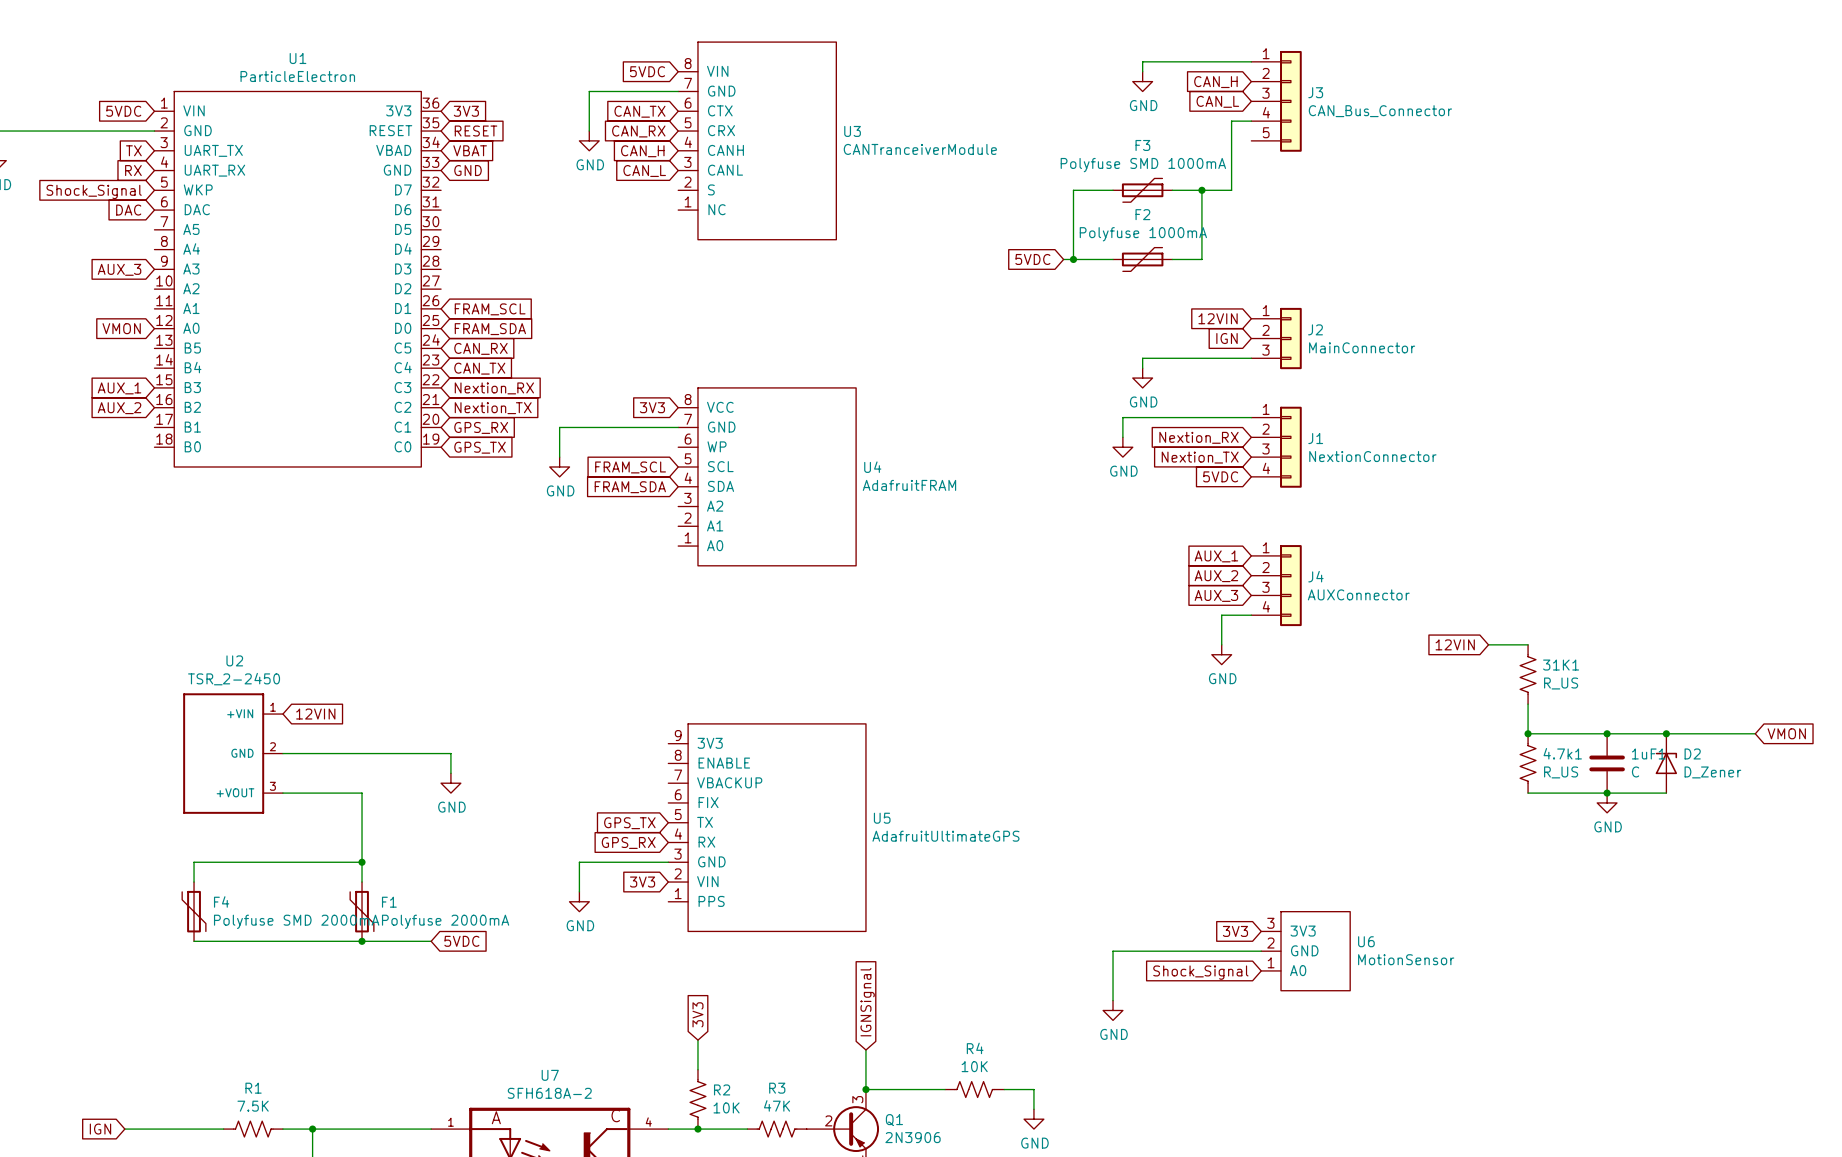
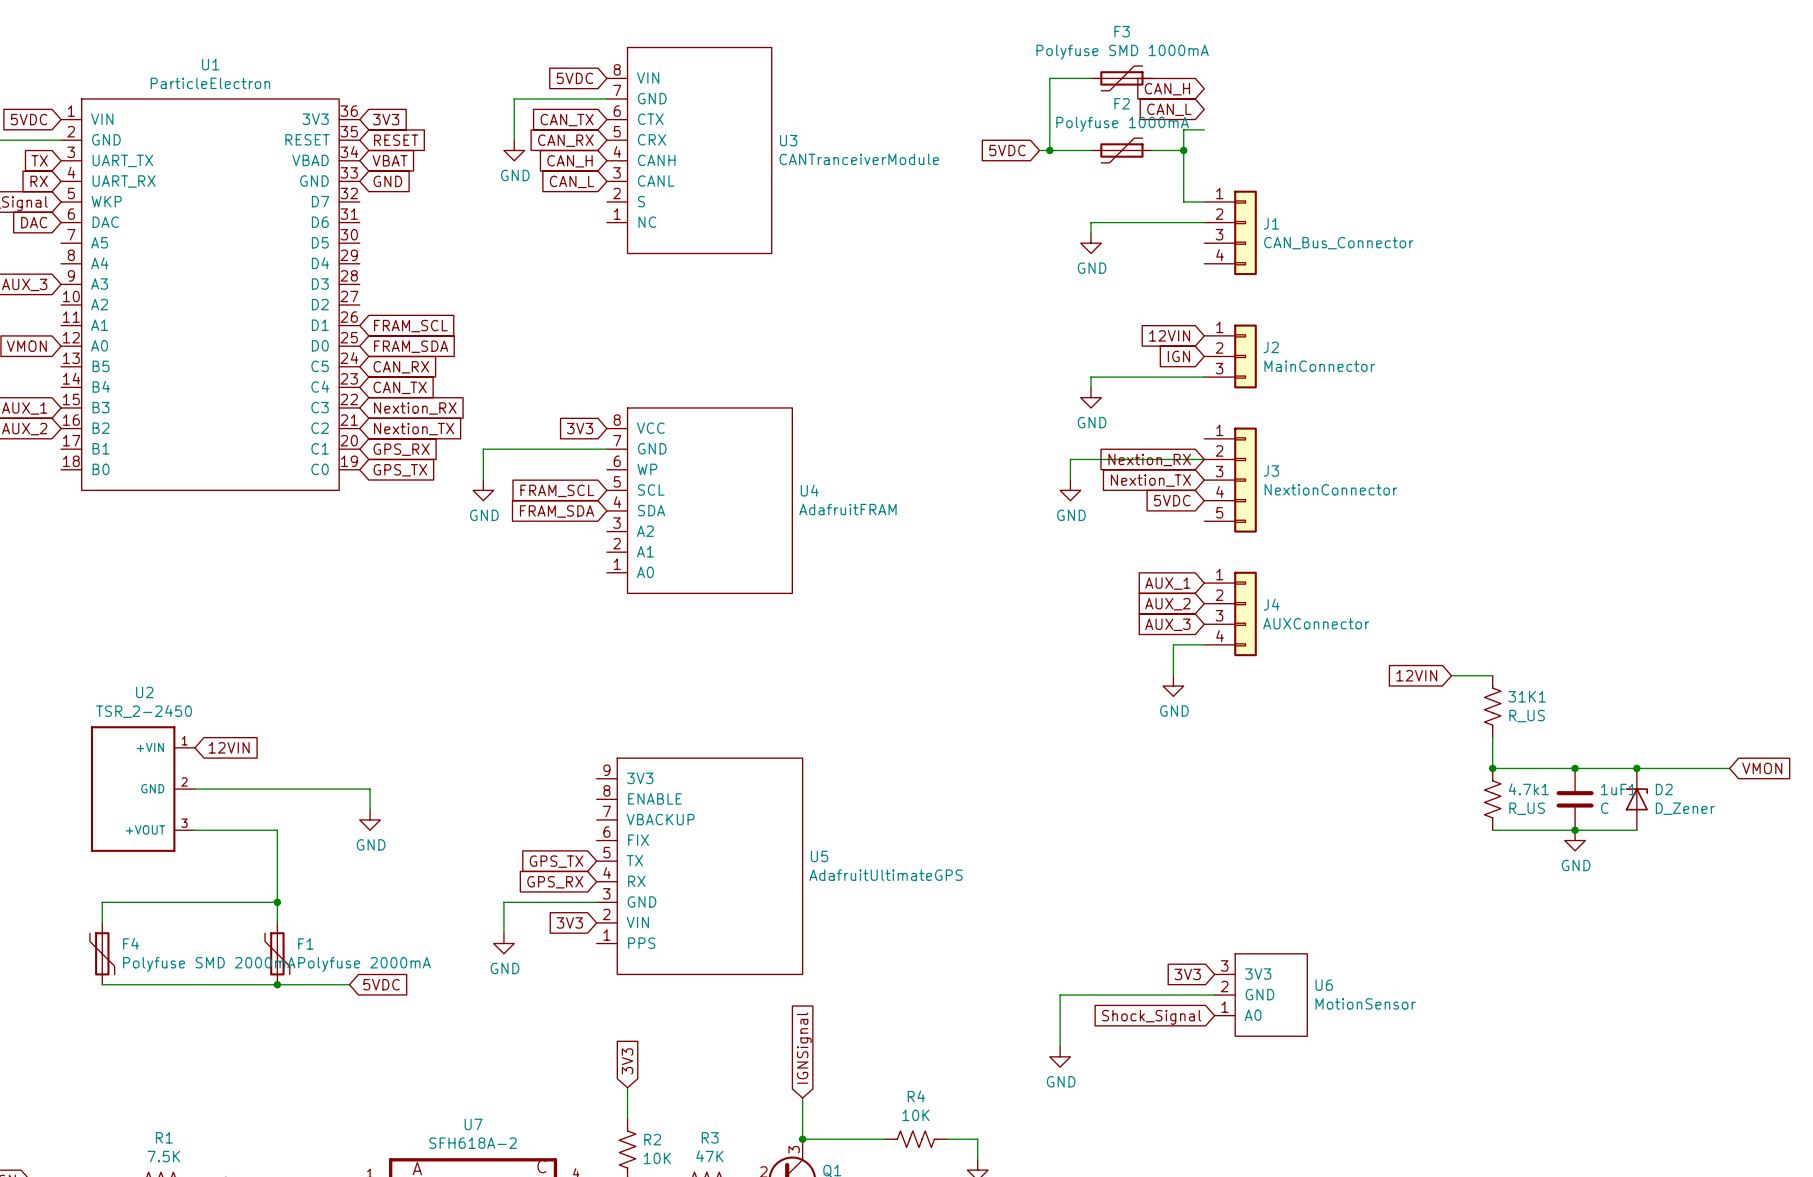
wire: (1251, 61) (1142, 61) (1142, 71) -> (1049, 150) (1049, 78) (1091, 78)
power symbol: GND (1142, 81) -> none
J3 position: (1276, 101) -> (1230, 480)
J3 value: CAN_Bus_Connector (1380, 111) -> NextionConnector (1330, 489)
junction: none -> (1049, 150)
wire: none -> (1152, 150) (1183, 150)
junction: none -> (1183, 150)
wire: (1113, 190) (1073, 190) (1073, 259) -> none
F3 position: (1142, 190) -> (1121, 78)
wire: (1172, 190) (1231, 190) -> (1204, 201) (1183, 201)
wire: (1201, 190) (1201, 259) (1172, 259) -> none
junction: (1201, 190) -> none
wire: none -> (1204, 222) (1091, 222) (1091, 232)
power symbol: none -> GND (1091, 243)
global label position: 5VDC (1032, 259) -> 5VDC (1007, 150)
wire: (1063, 259) (1113, 259) -> (1039, 150) (1091, 150)
junction: (1073, 259) -> none
F2 position: (1142, 259) -> (1121, 150)
wire: (1251, 417) (1122, 417) (1122, 437) -> (1204, 459) (1070, 459) (1070, 480)
power symbol position: GND (1122, 447) -> GND (1070, 490)
J1 position: (1276, 447) -> (1230, 232)
J1 value: NextionConnector (1372, 456) -> CAN_Bus_Connector (1338, 243)

